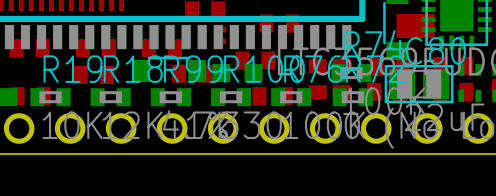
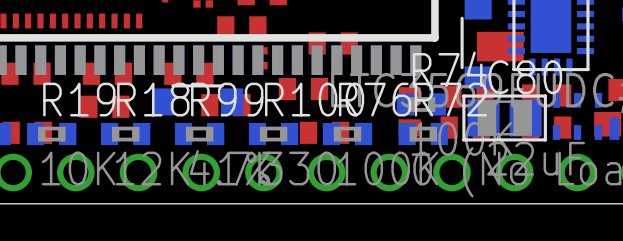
part: (237, 73) -> none
part: (317, 79) -> none

